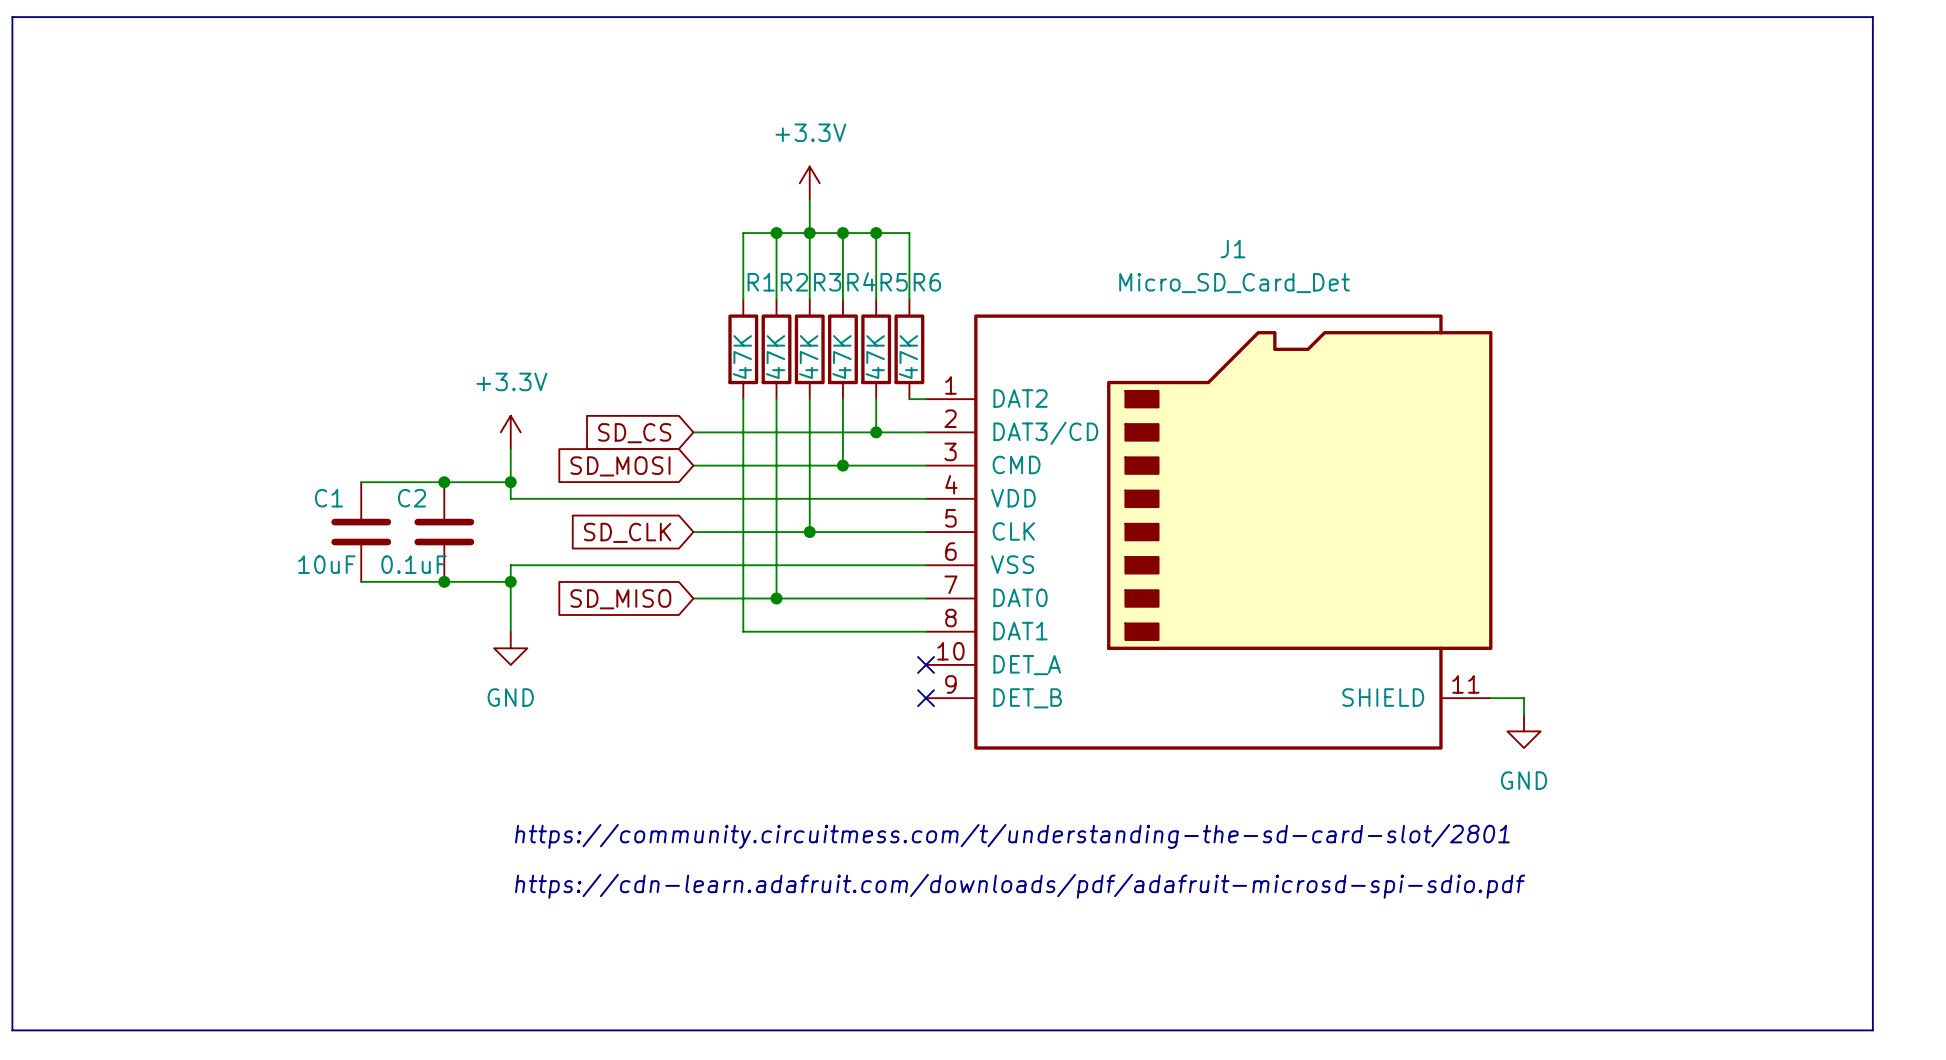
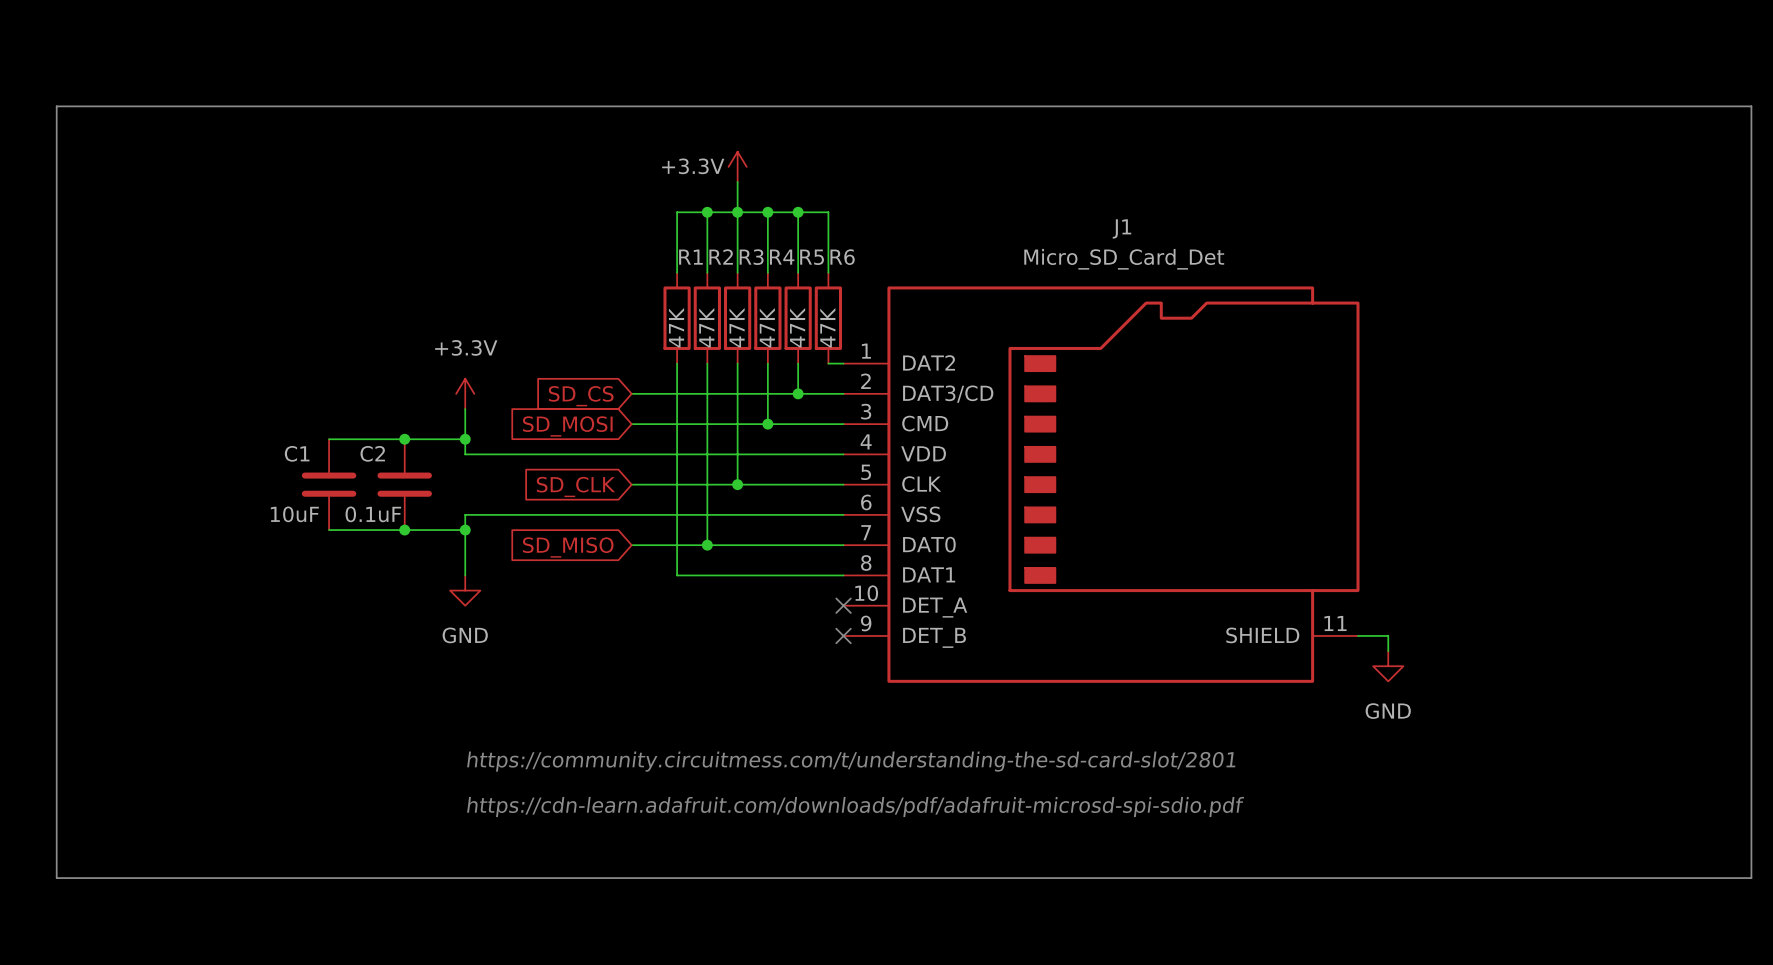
line: (12, 17) (1872, 17) (1872, 1030) (12, 1030) (12, 17) -> (56, 106) (56, 878) (1751, 878) (1751, 106) (56, 106)
power symbol text position: +3.3V (810, 132) -> +3.3V (693, 166)

